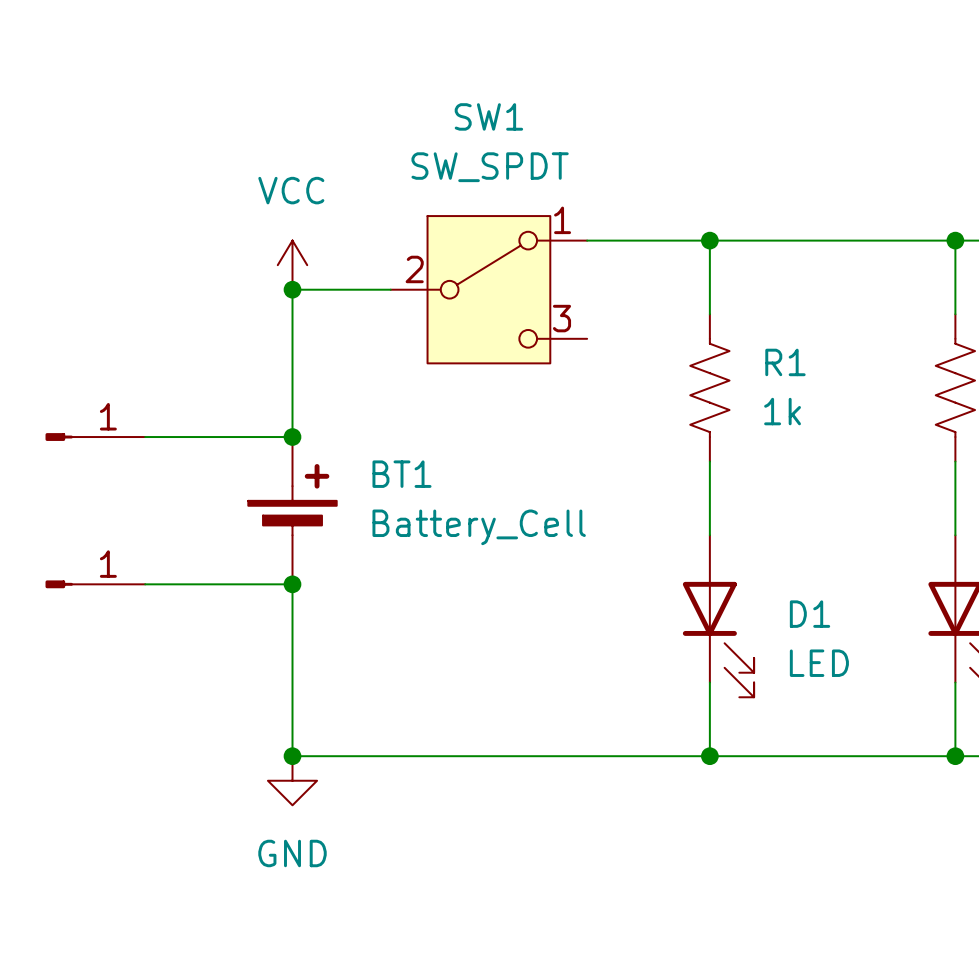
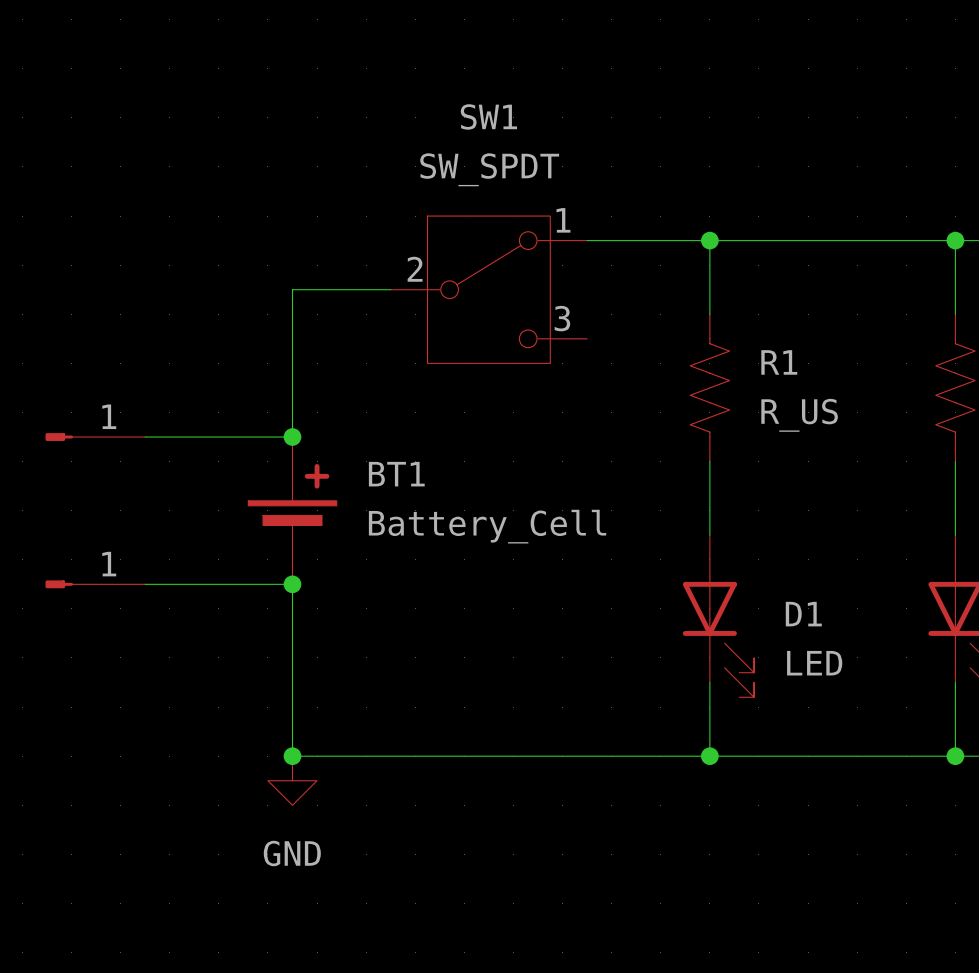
power symbol: VCC (292, 265) -> none
junction: (292, 289) -> none
R1 value: 1k (782, 411) -> R_US (799, 415)

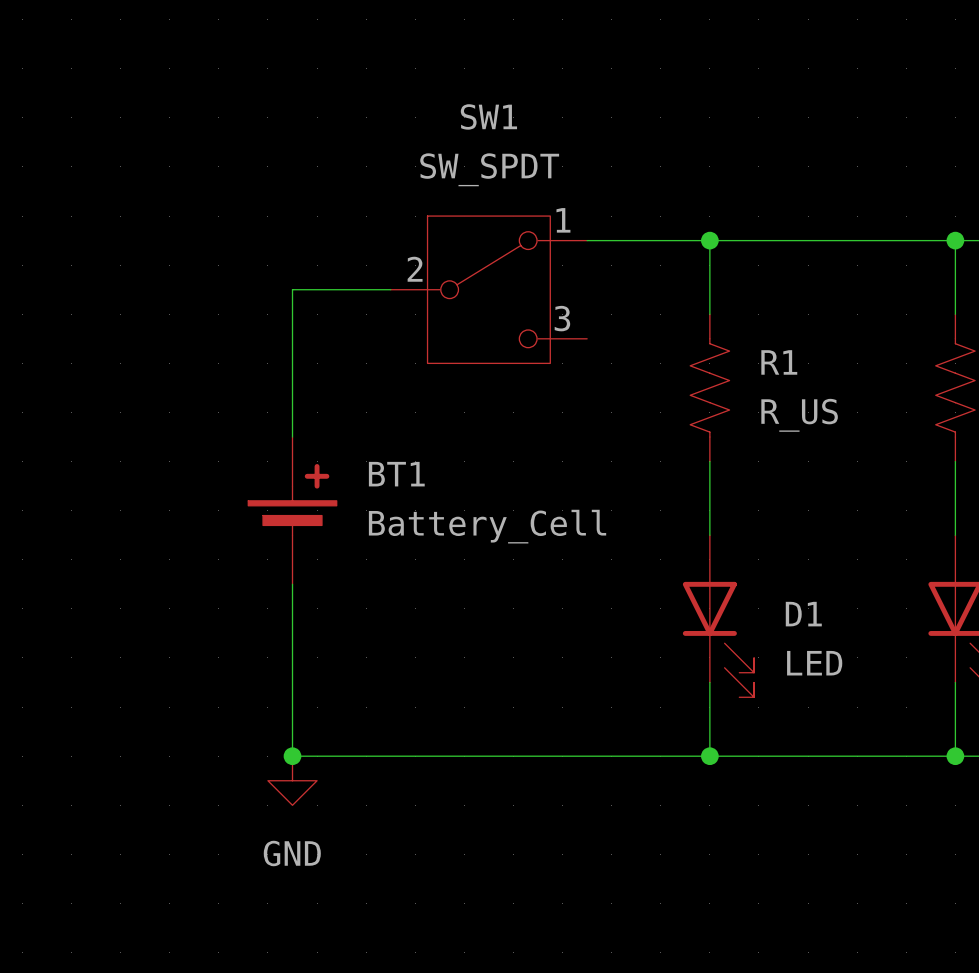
part: (95, 437) -> none
wire: (145, 437) (292, 437) -> none
junction: (292, 437) -> none
part: (95, 584) -> none
wire: (145, 584) (292, 584) -> none
junction: (292, 584) -> none

